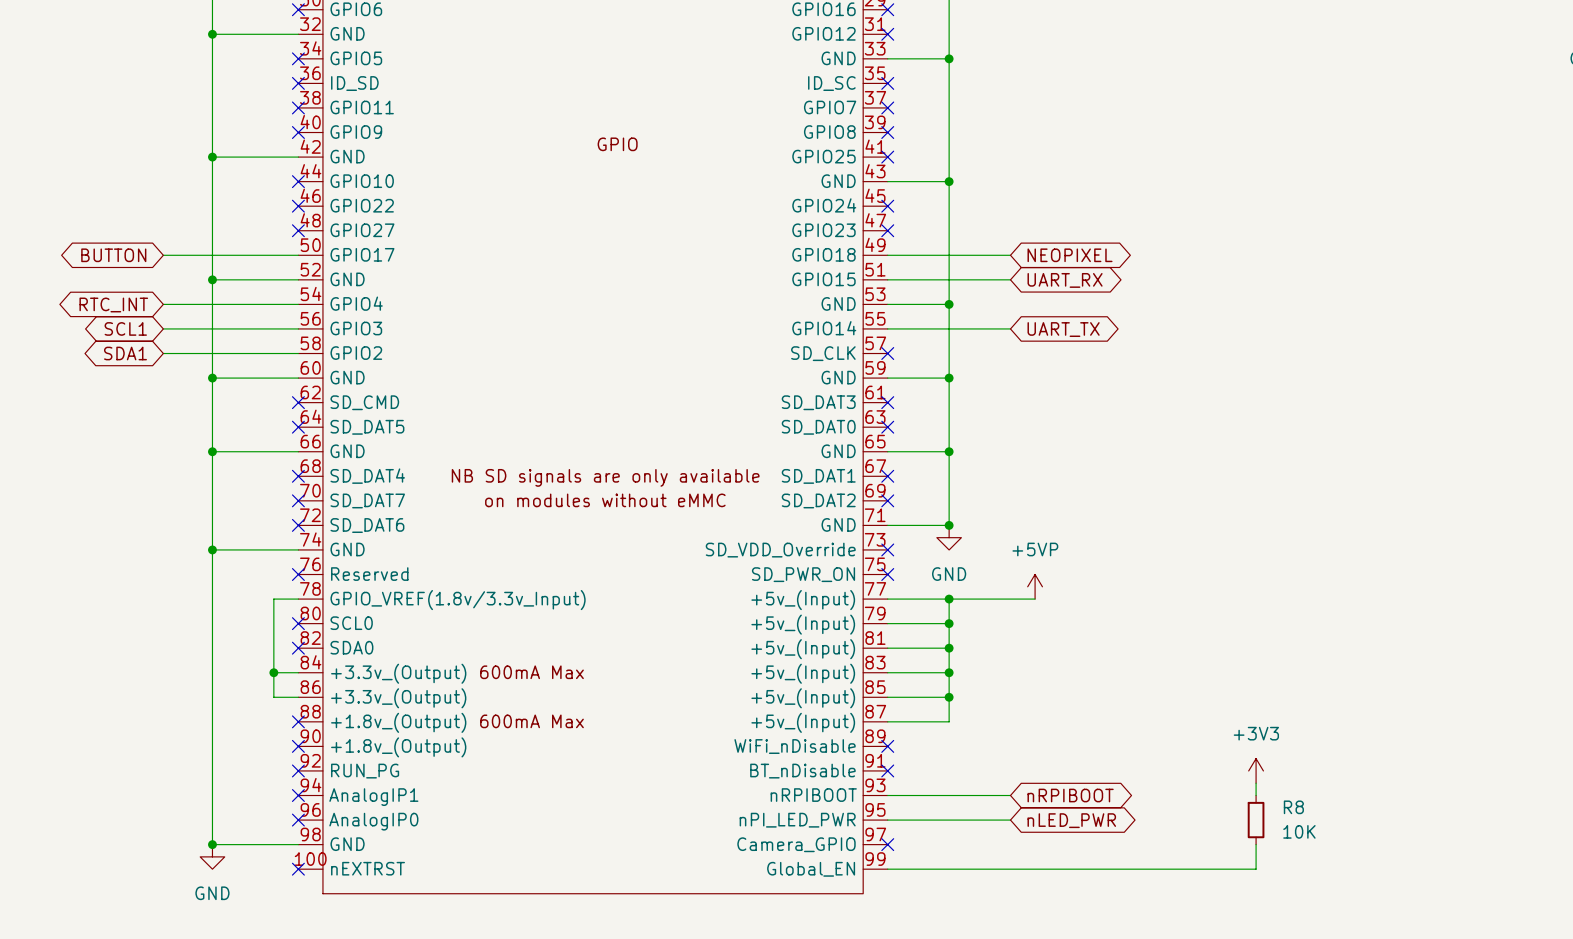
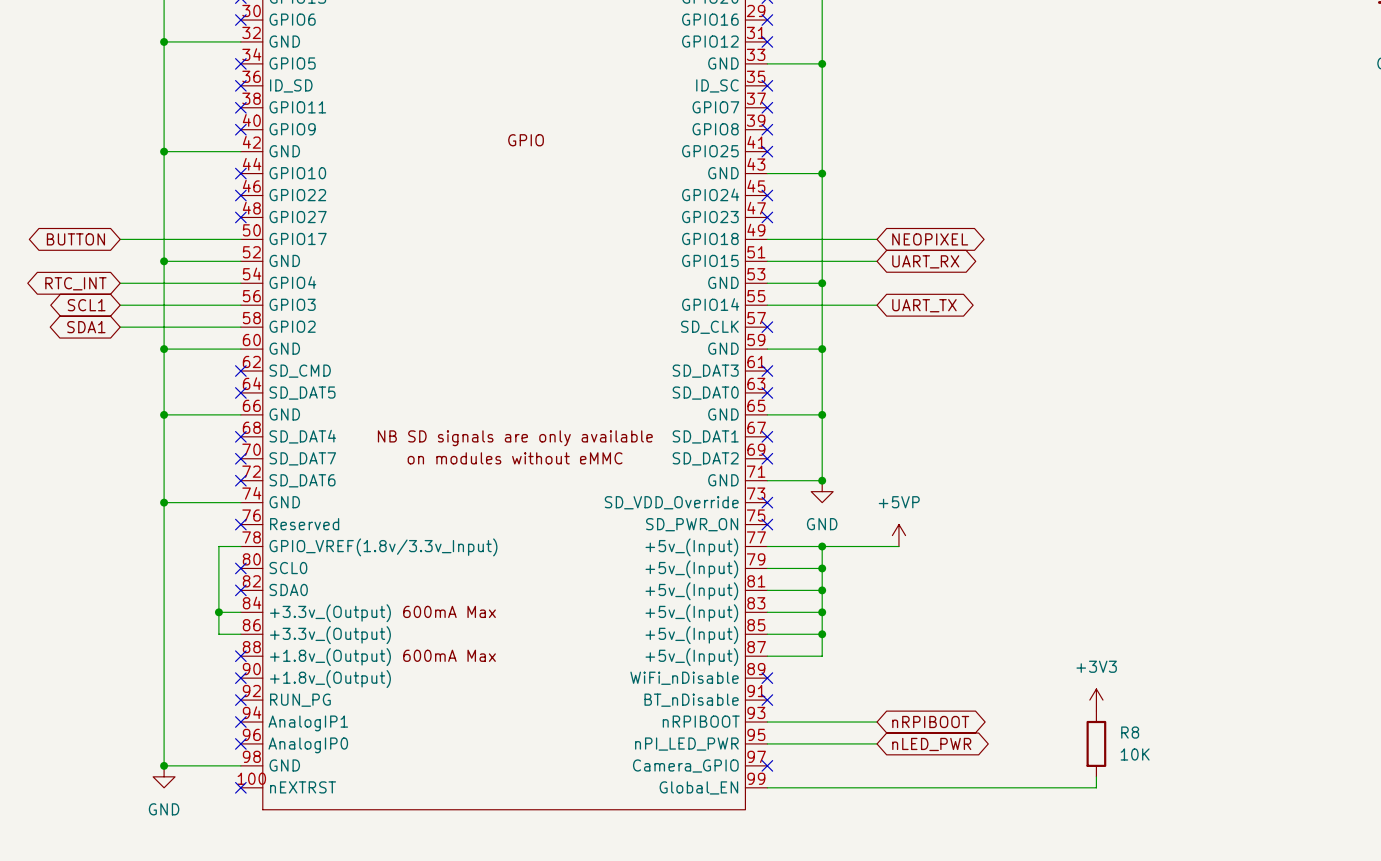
R8 symbol: [1247, 795, 1265, 845] -> [1086, 711, 1107, 777]

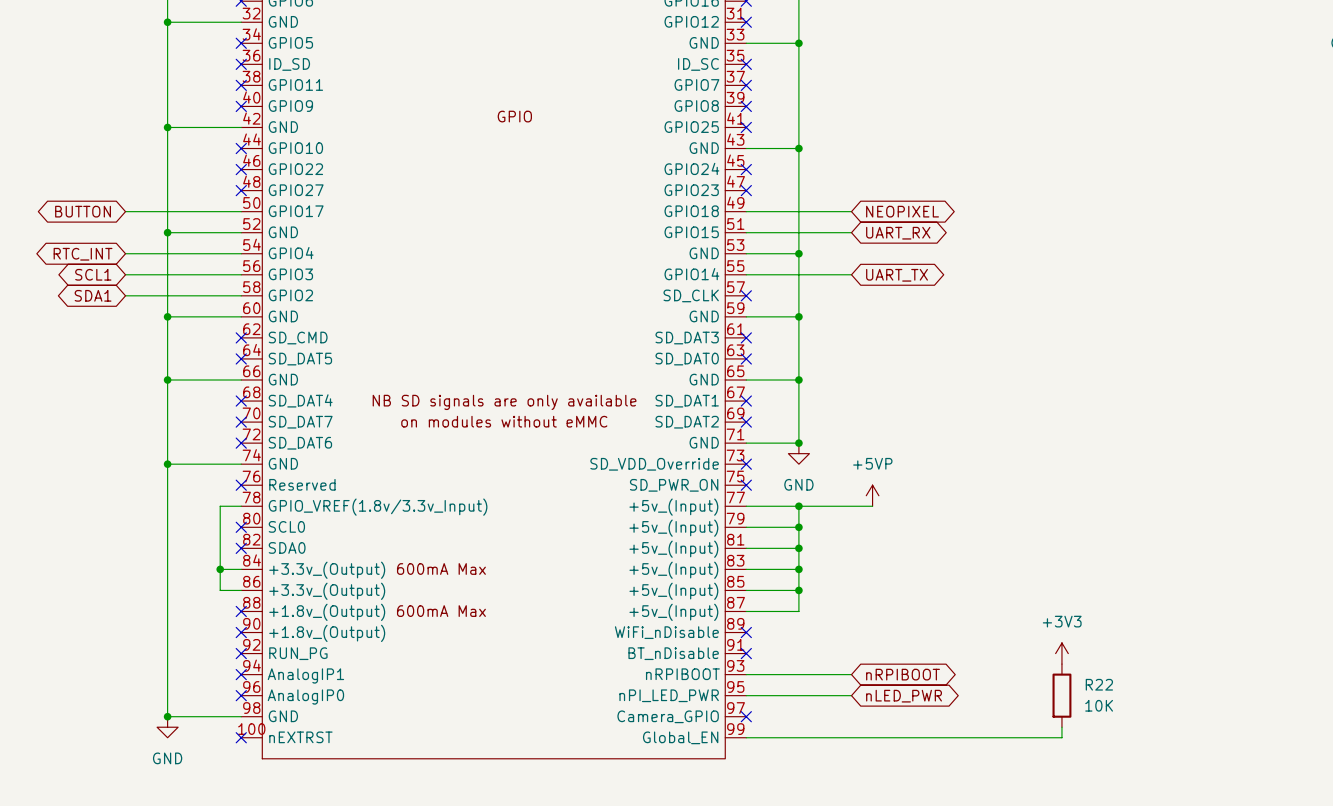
R8 name: R8 (1130, 732) -> R22 (1099, 684)

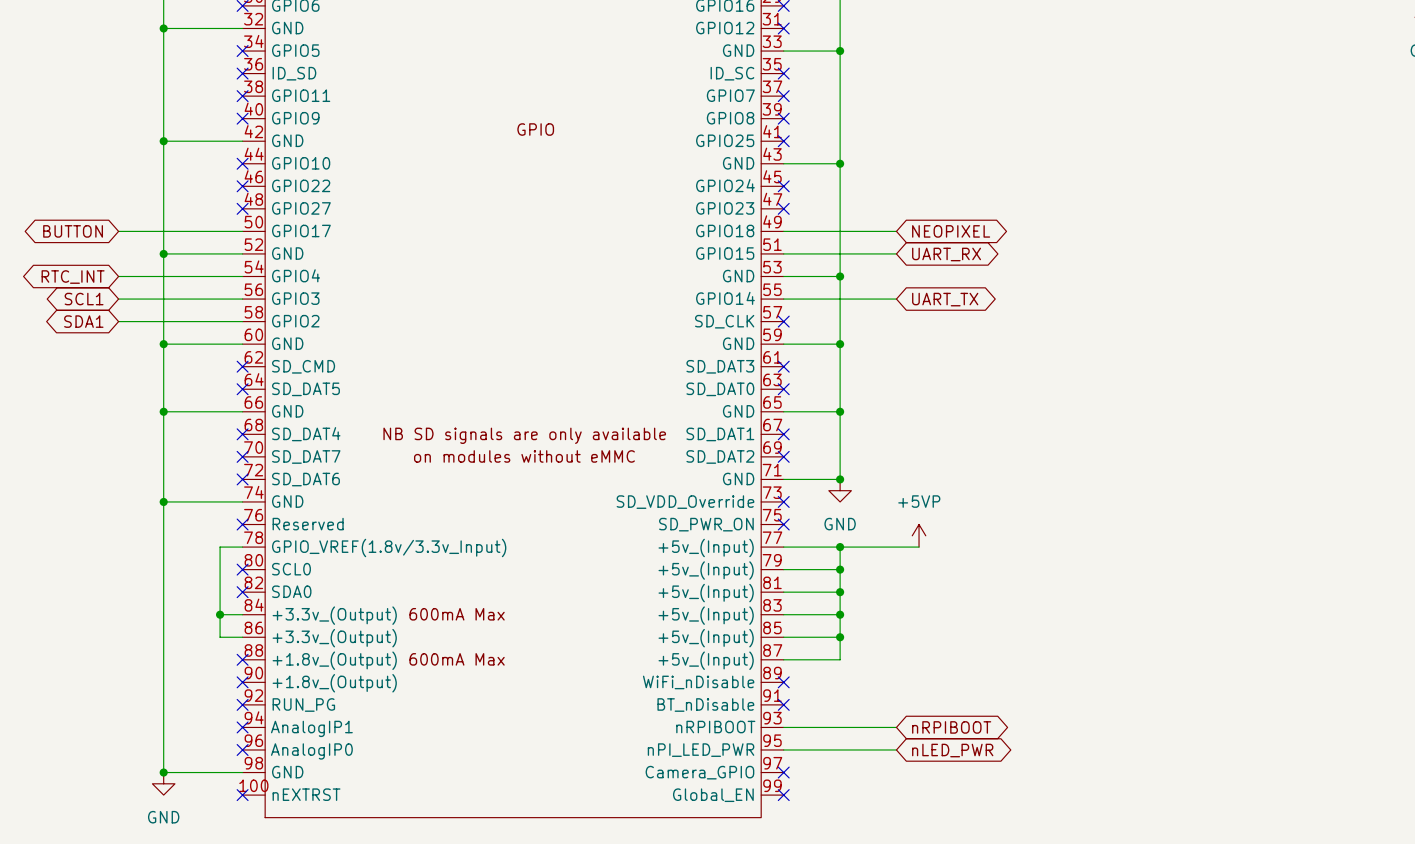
power symbol: +3V3 (1061, 653) -> none
R22: 10K (1061, 695) -> none
wire: (1061, 727) (1061, 737) (746, 737) -> none
no-connect mark: none -> (783, 795)

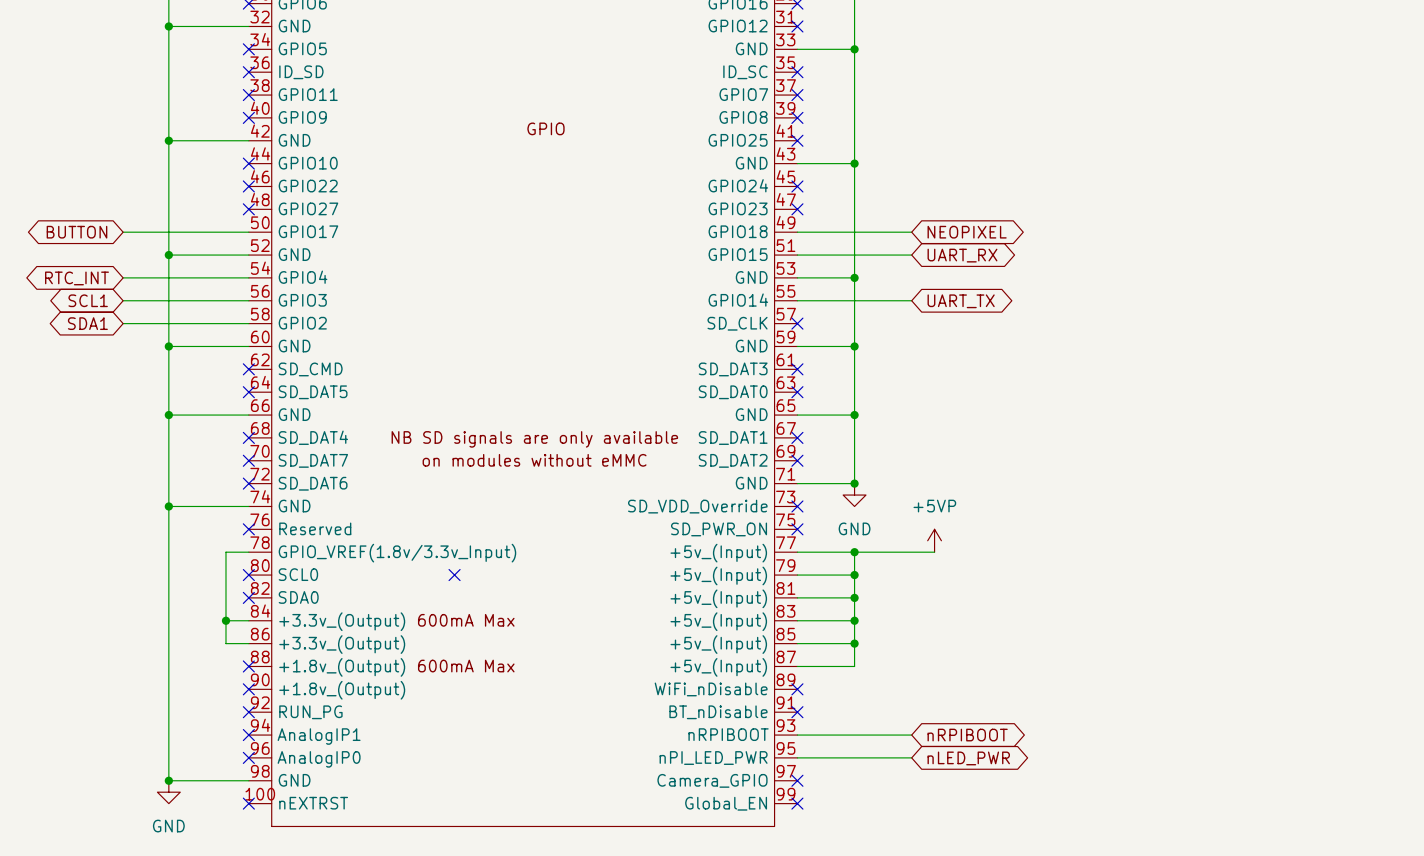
no-connect mark: none -> (454, 575)

